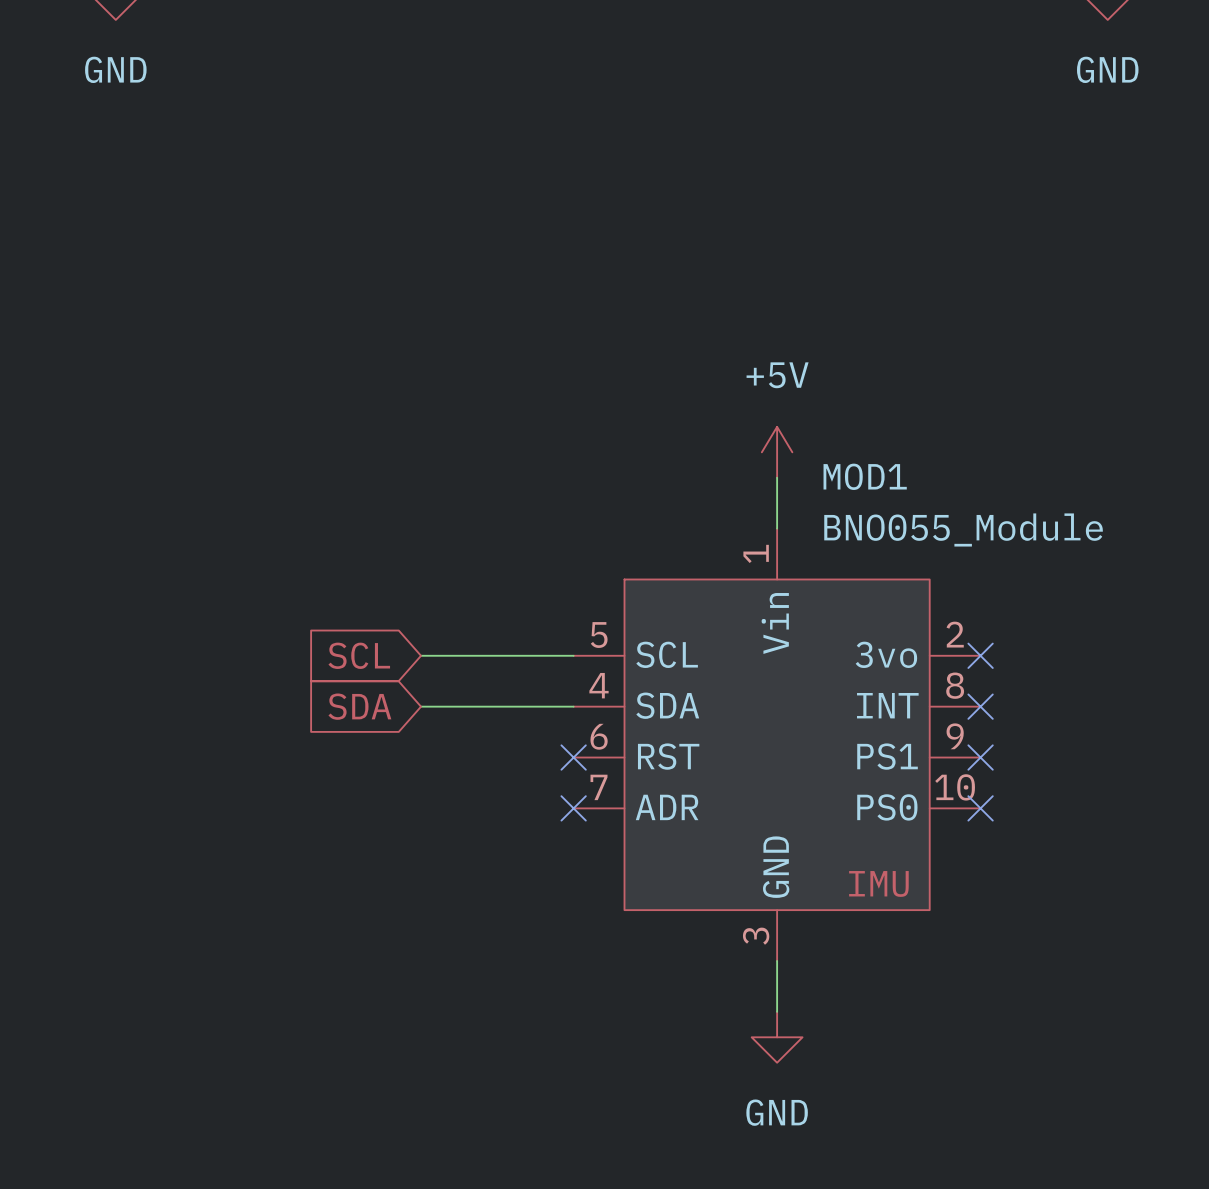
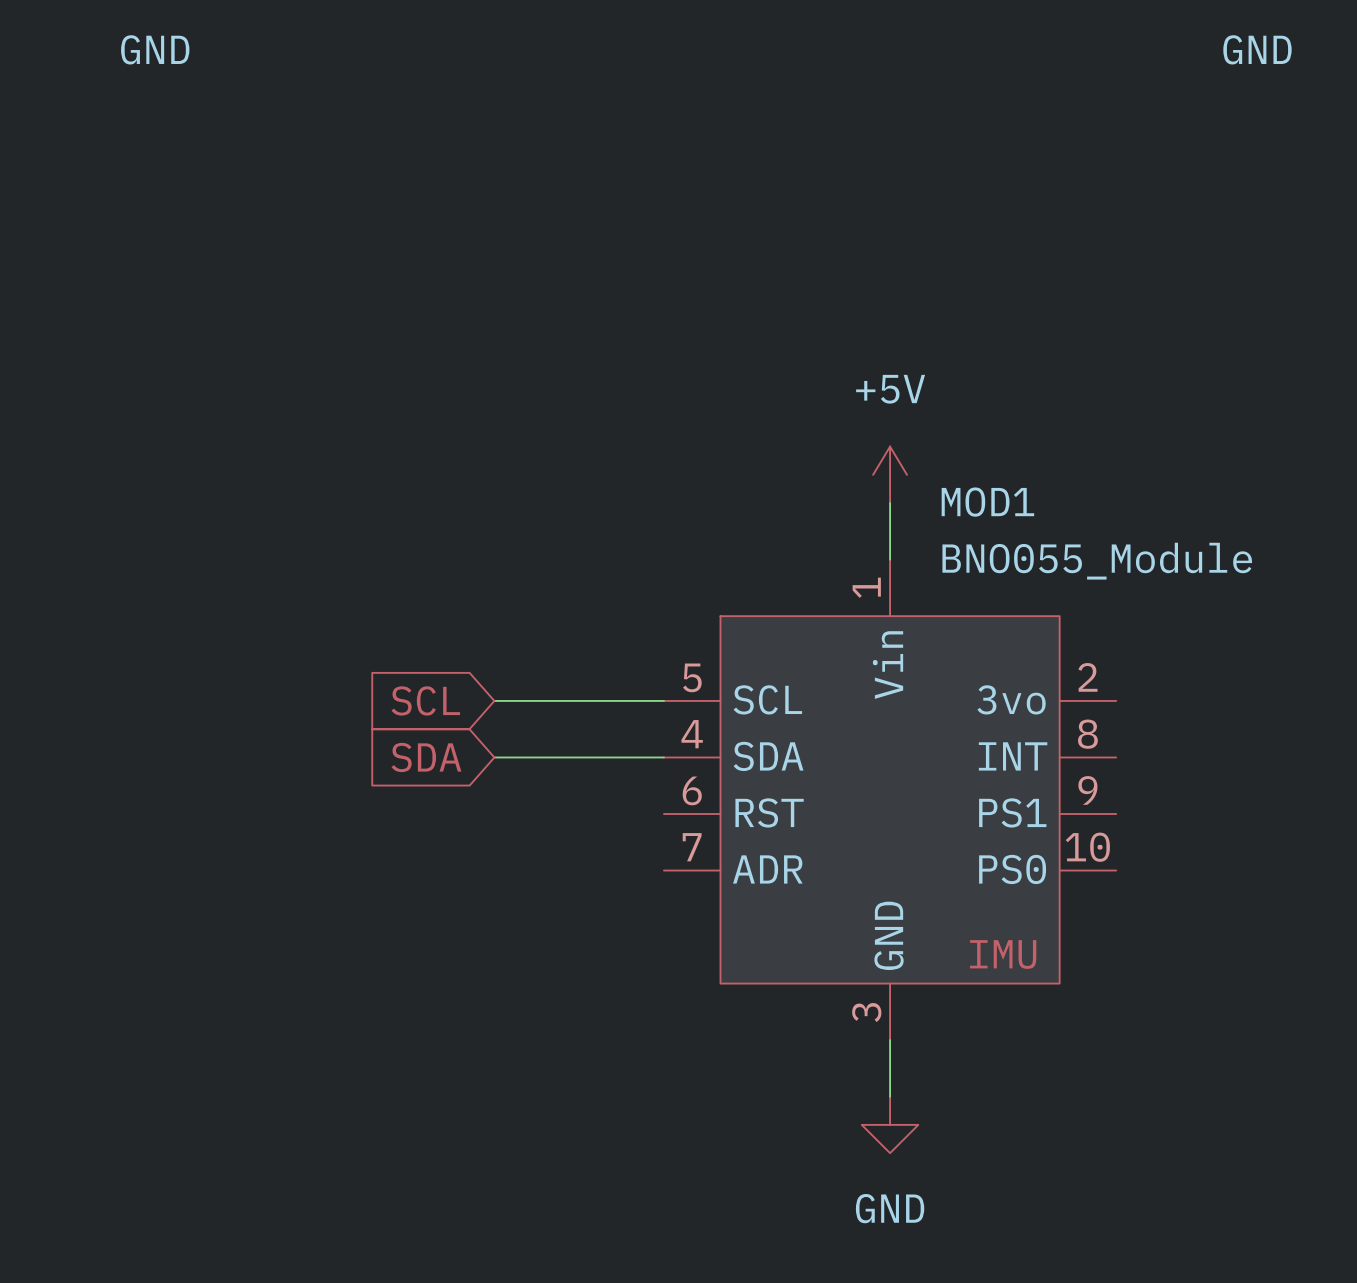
no-connect mark: (980, 655) -> none
no-connect mark: (980, 706) -> none
no-connect mark: (573, 757) -> none
no-connect mark: (980, 757) -> none
no-connect mark: (573, 808) -> none
no-connect mark: (980, 808) -> none

